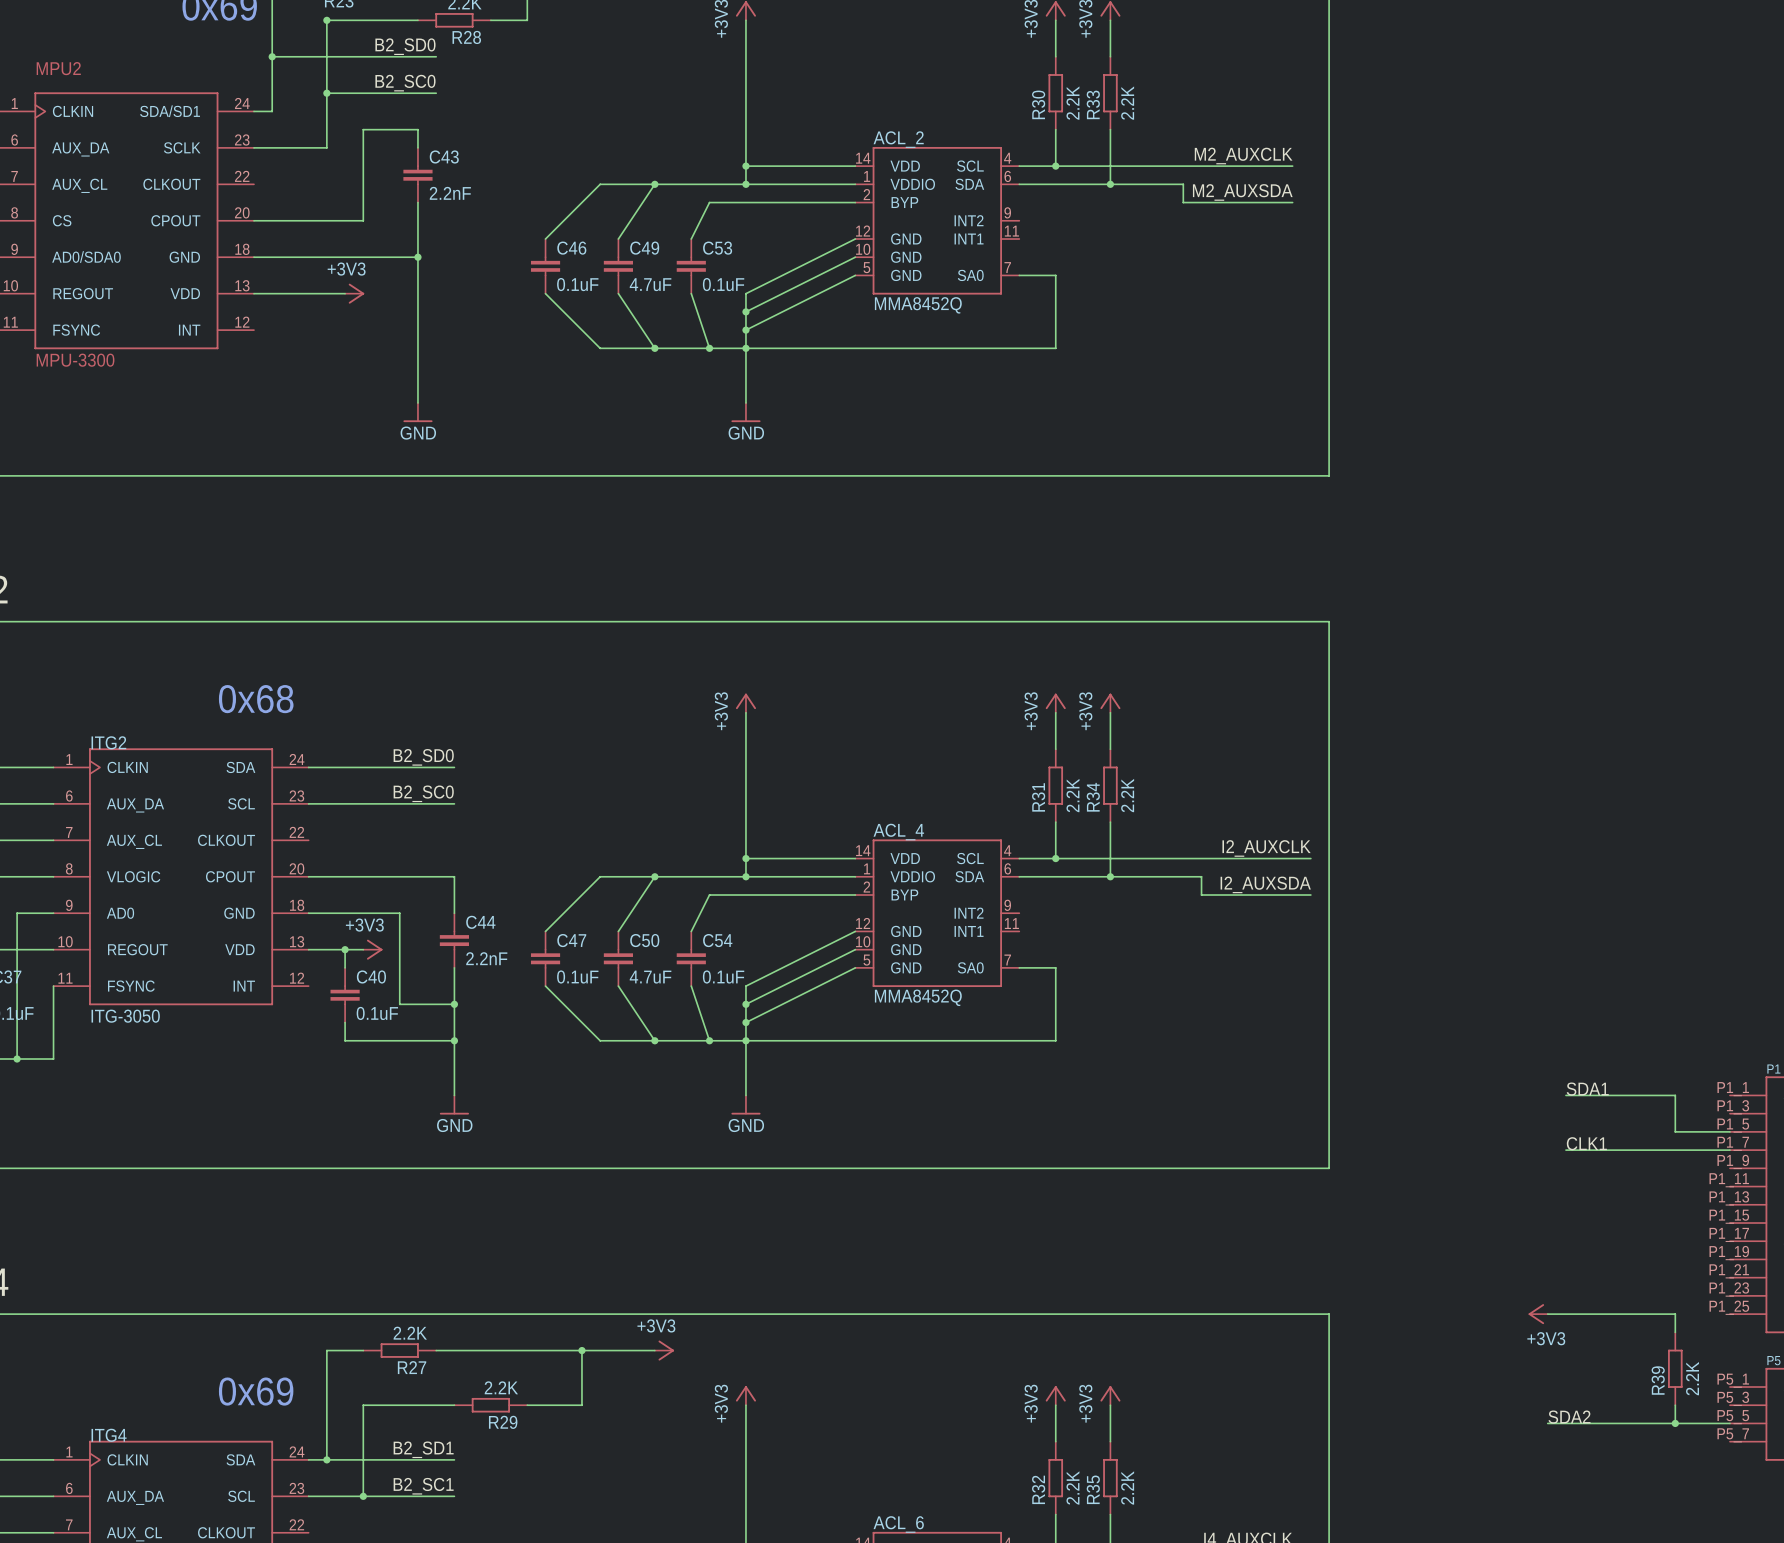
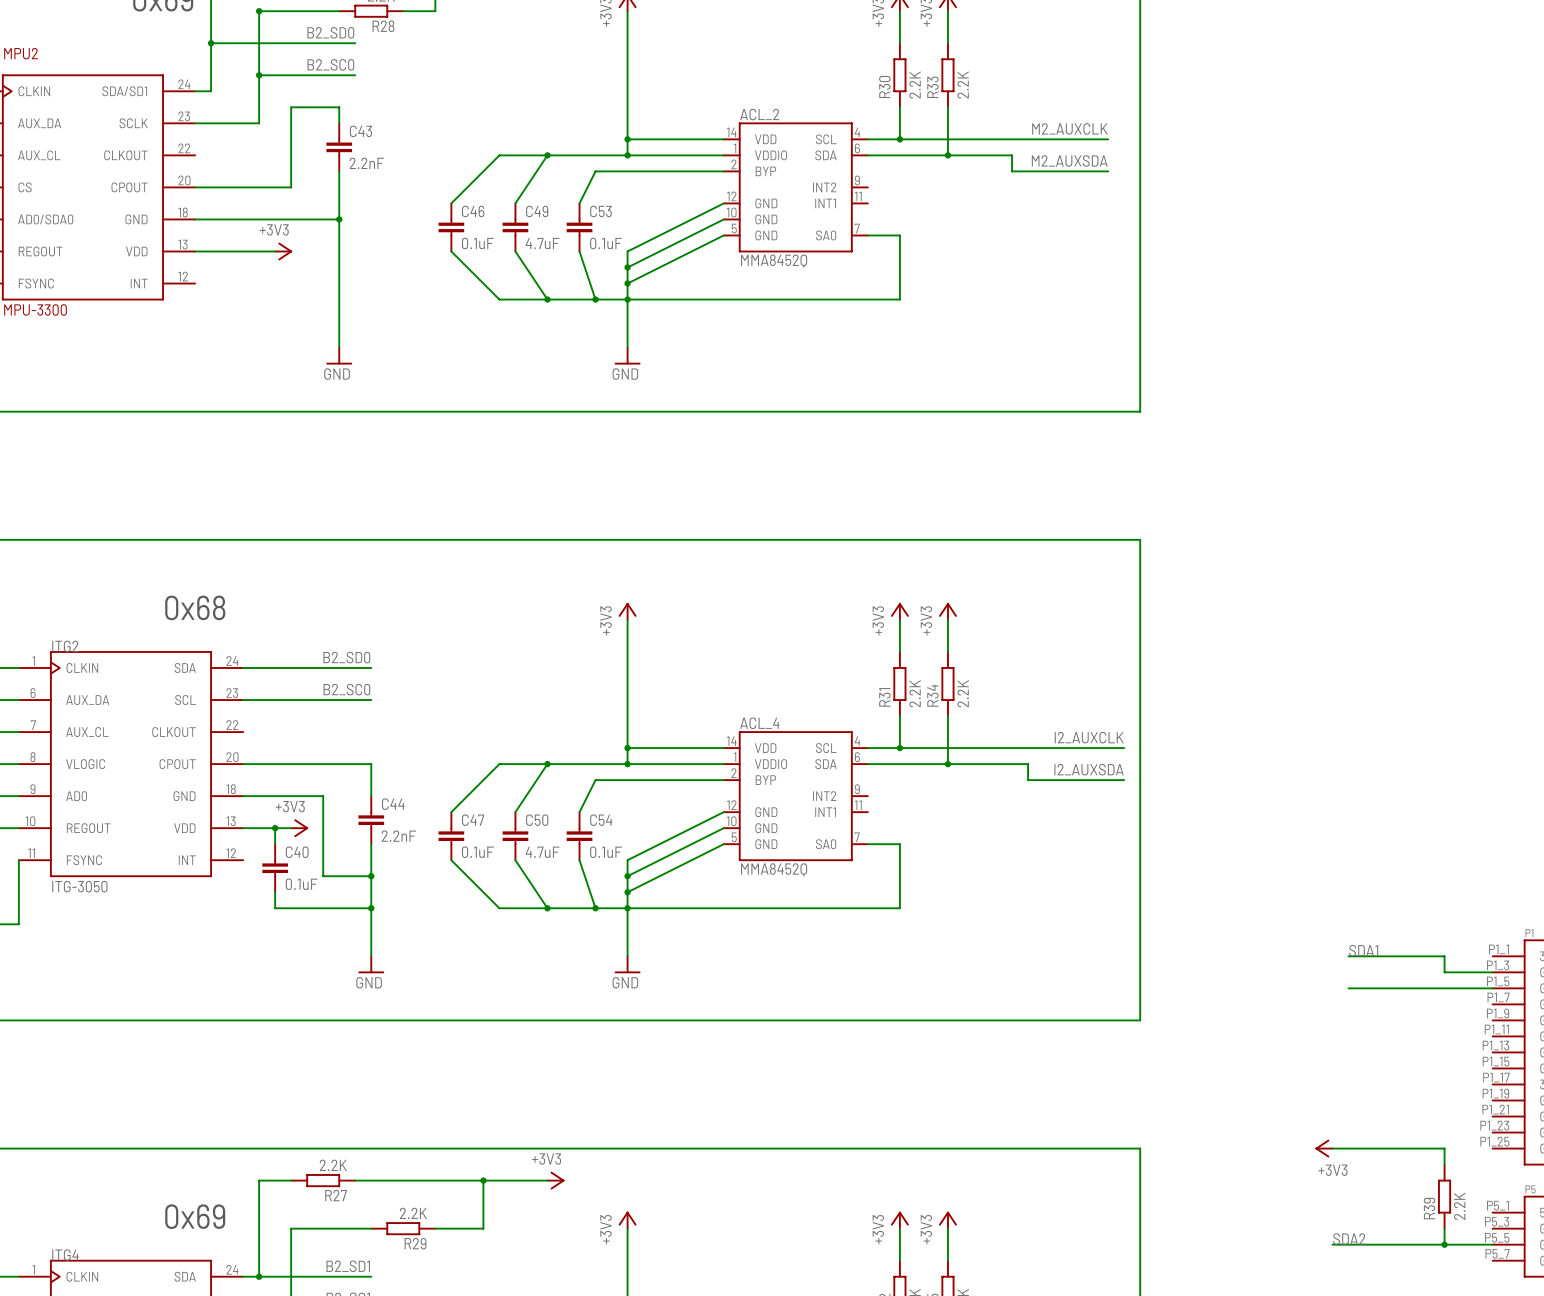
wire: (1675, 1113) (1675, 1131) -> (1444, 972) (1492, 972)
wire: none -> (1348, 988) (1444, 988)
label: CLK1 (1586, 1143) -> none
wire: (1565, 1150) (1729, 1150) -> none

